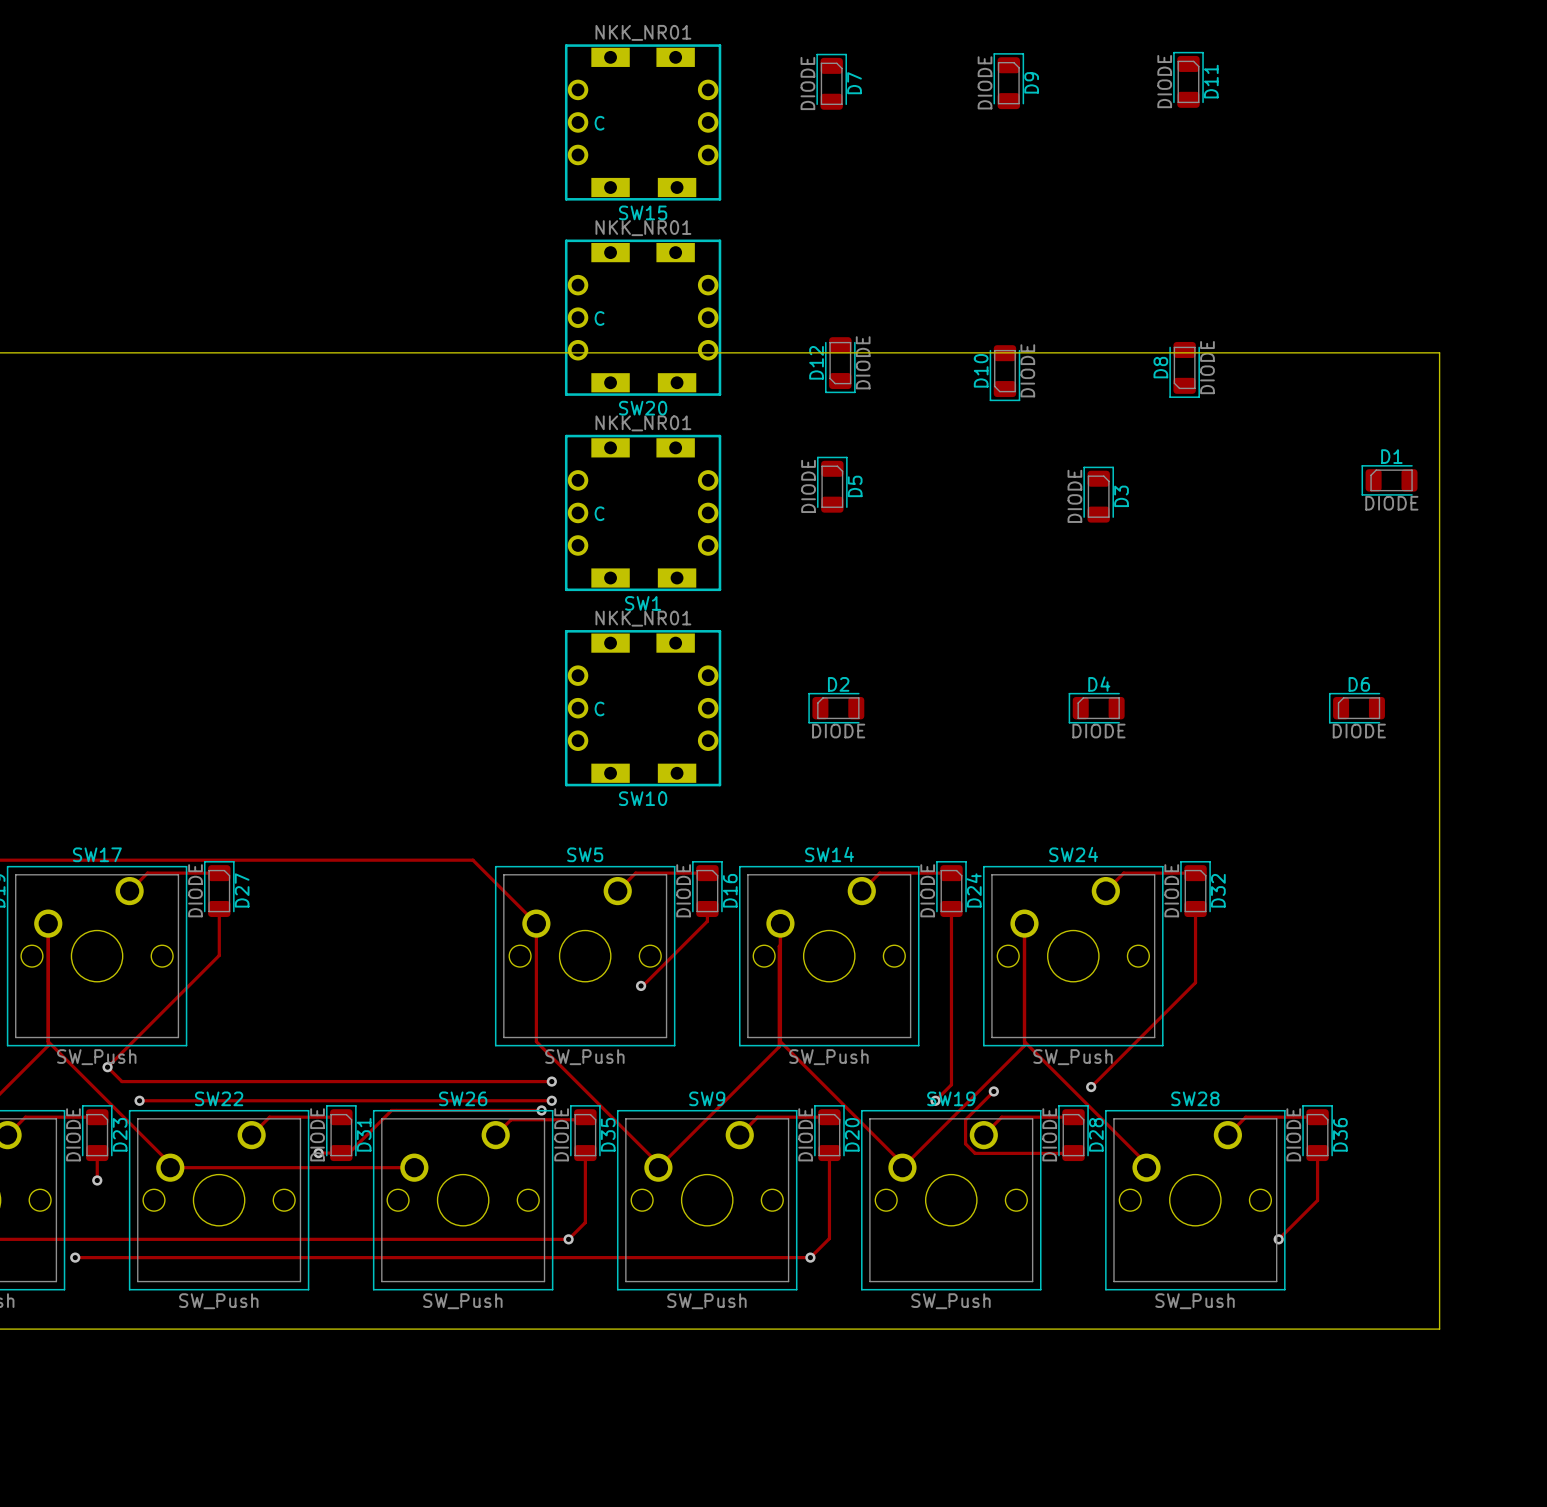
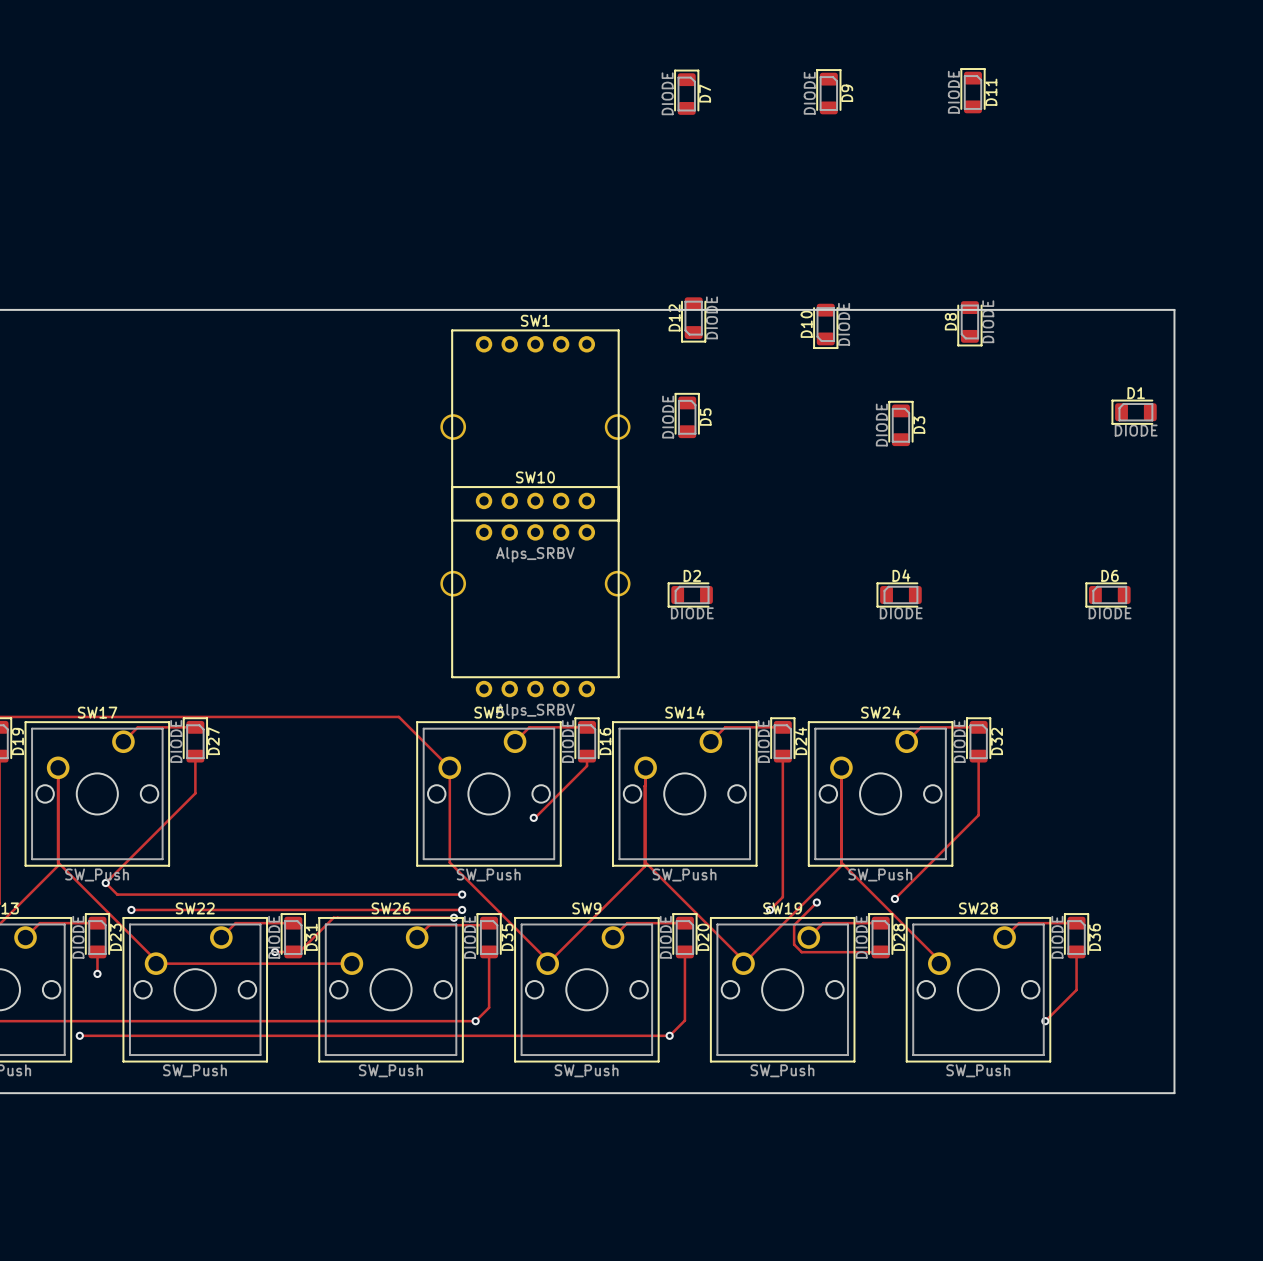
SW15: NKK_NR01 (643, 122) -> none
SW20: NKK_NR01 (643, 317) -> none
SW1 value: NKK_NR01 (643, 423) -> Alps_SRBV (535, 554)
SW1 footprint: [564, 434, 722, 592] -> [440, 329, 631, 541]
SW1 name position: SW1 (643, 603) -> SW1 (535, 320)
SW10 value: NKK_NR01 (643, 618) -> Alps_SRBV (535, 711)
SW10 footprint: [564, 630, 722, 787] -> [440, 486, 631, 698]
SW10 name position: SW10 (643, 798) -> SW10 (535, 477)

